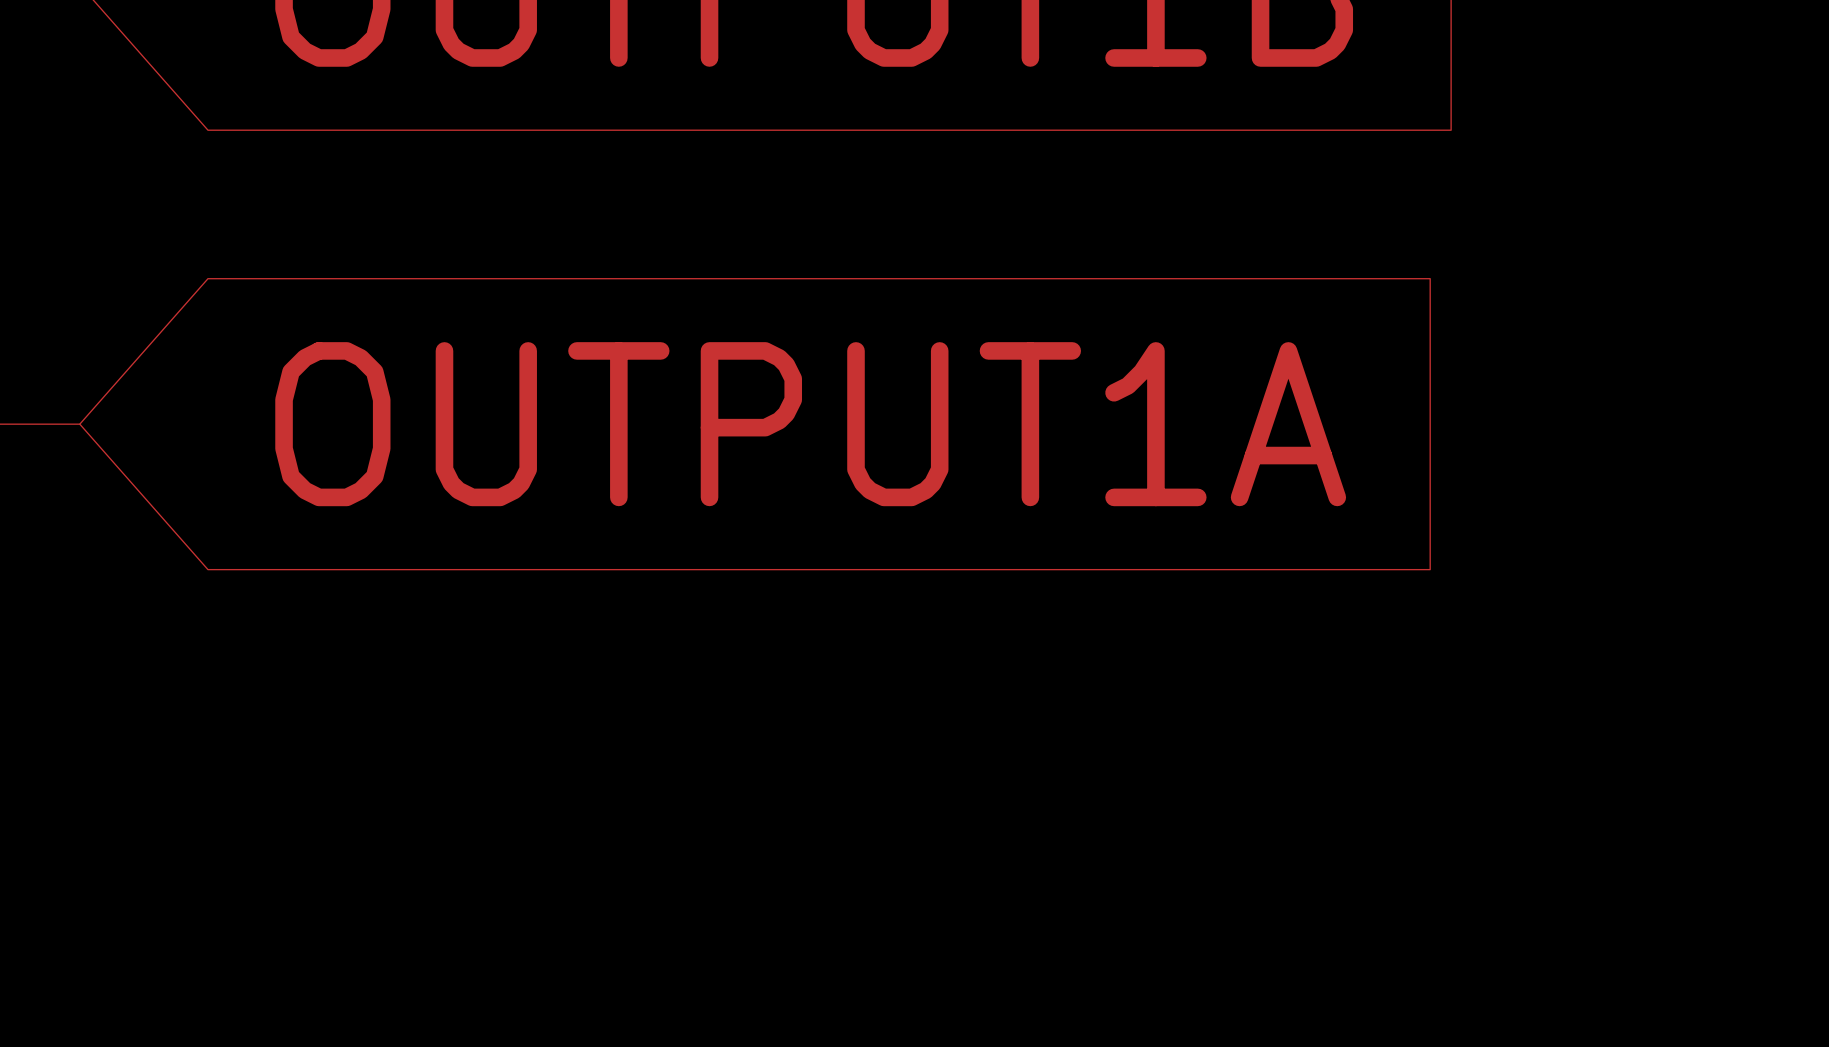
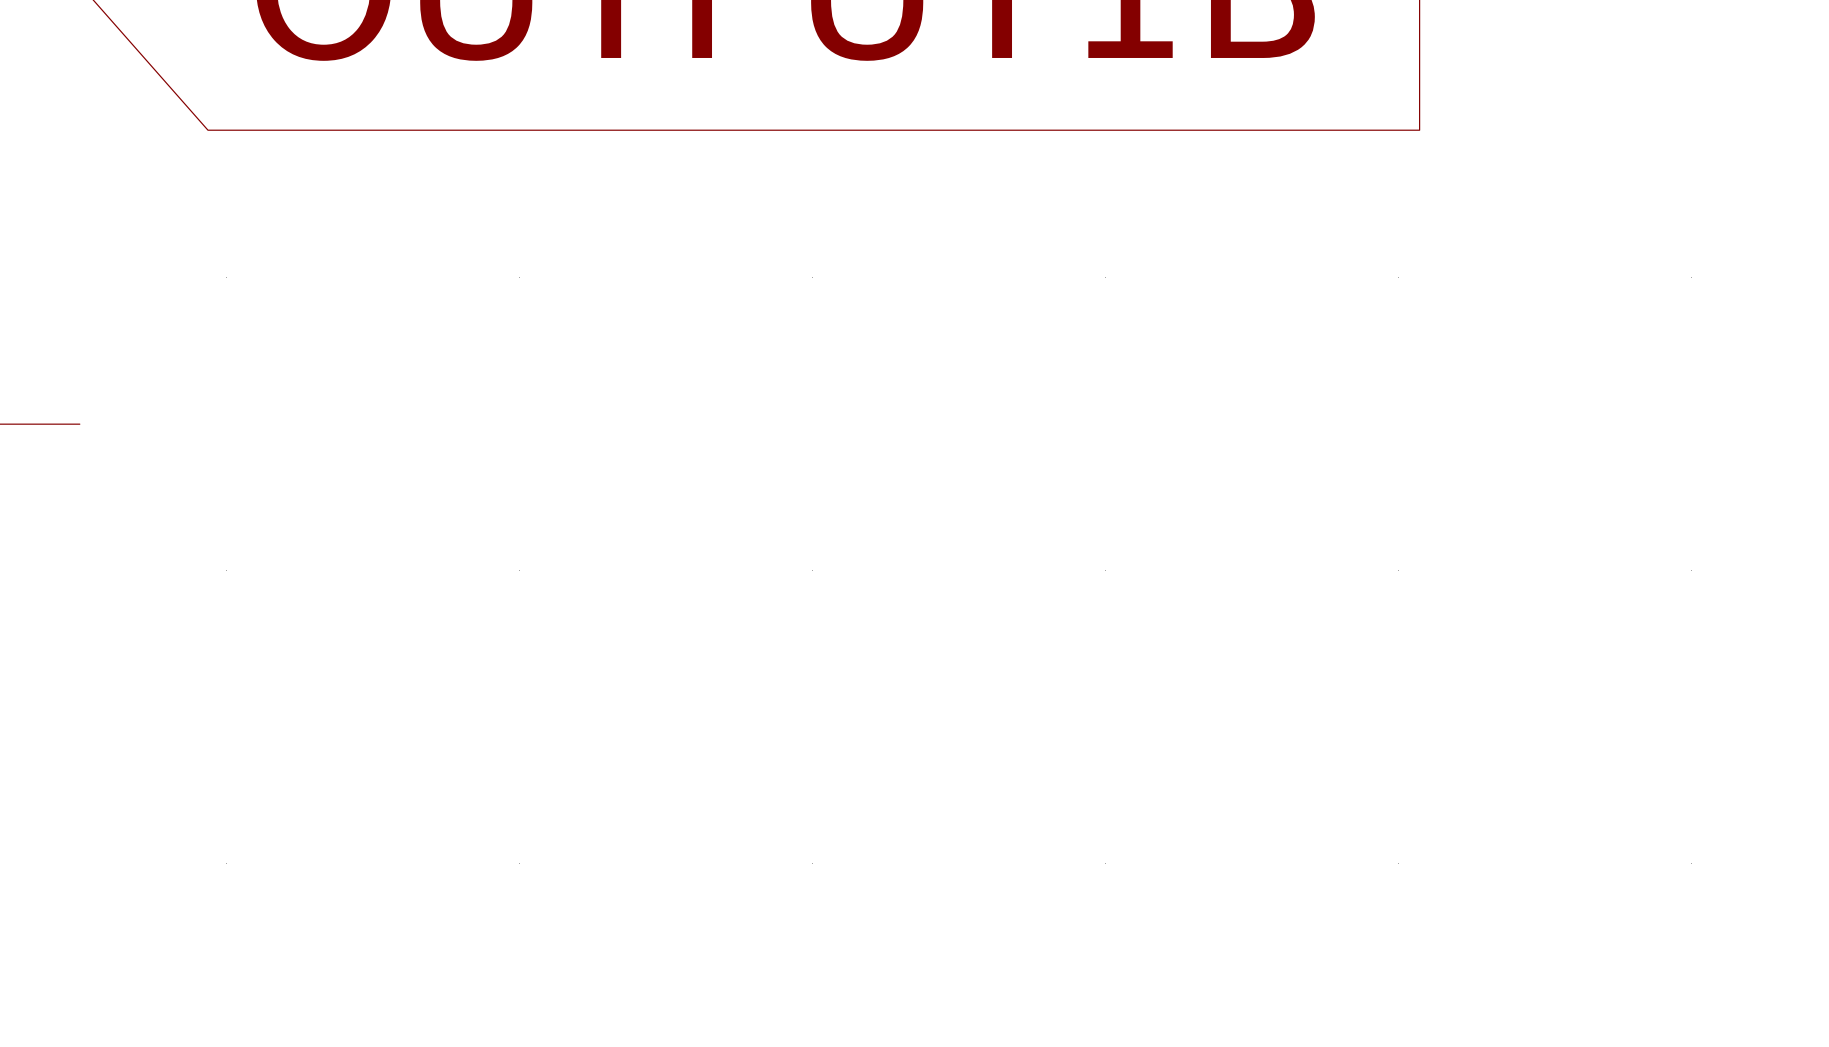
global label: OUTPUT1A (810, 424) -> none

